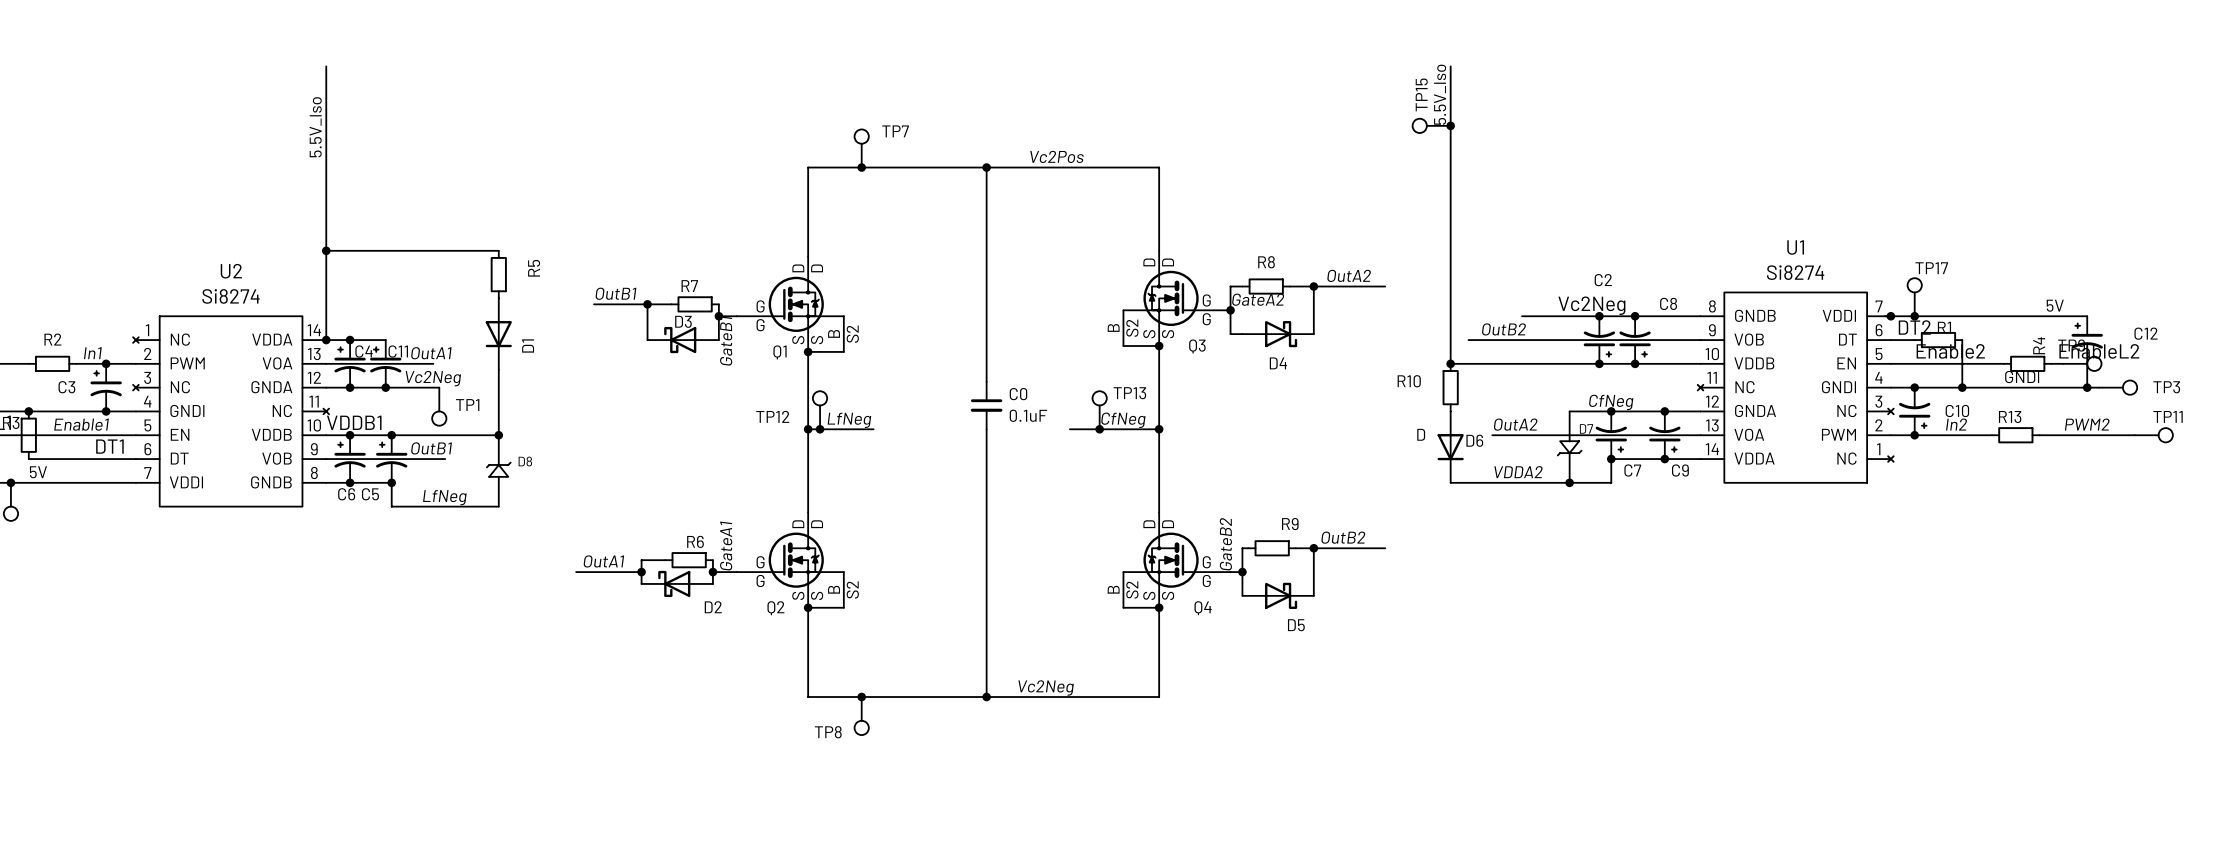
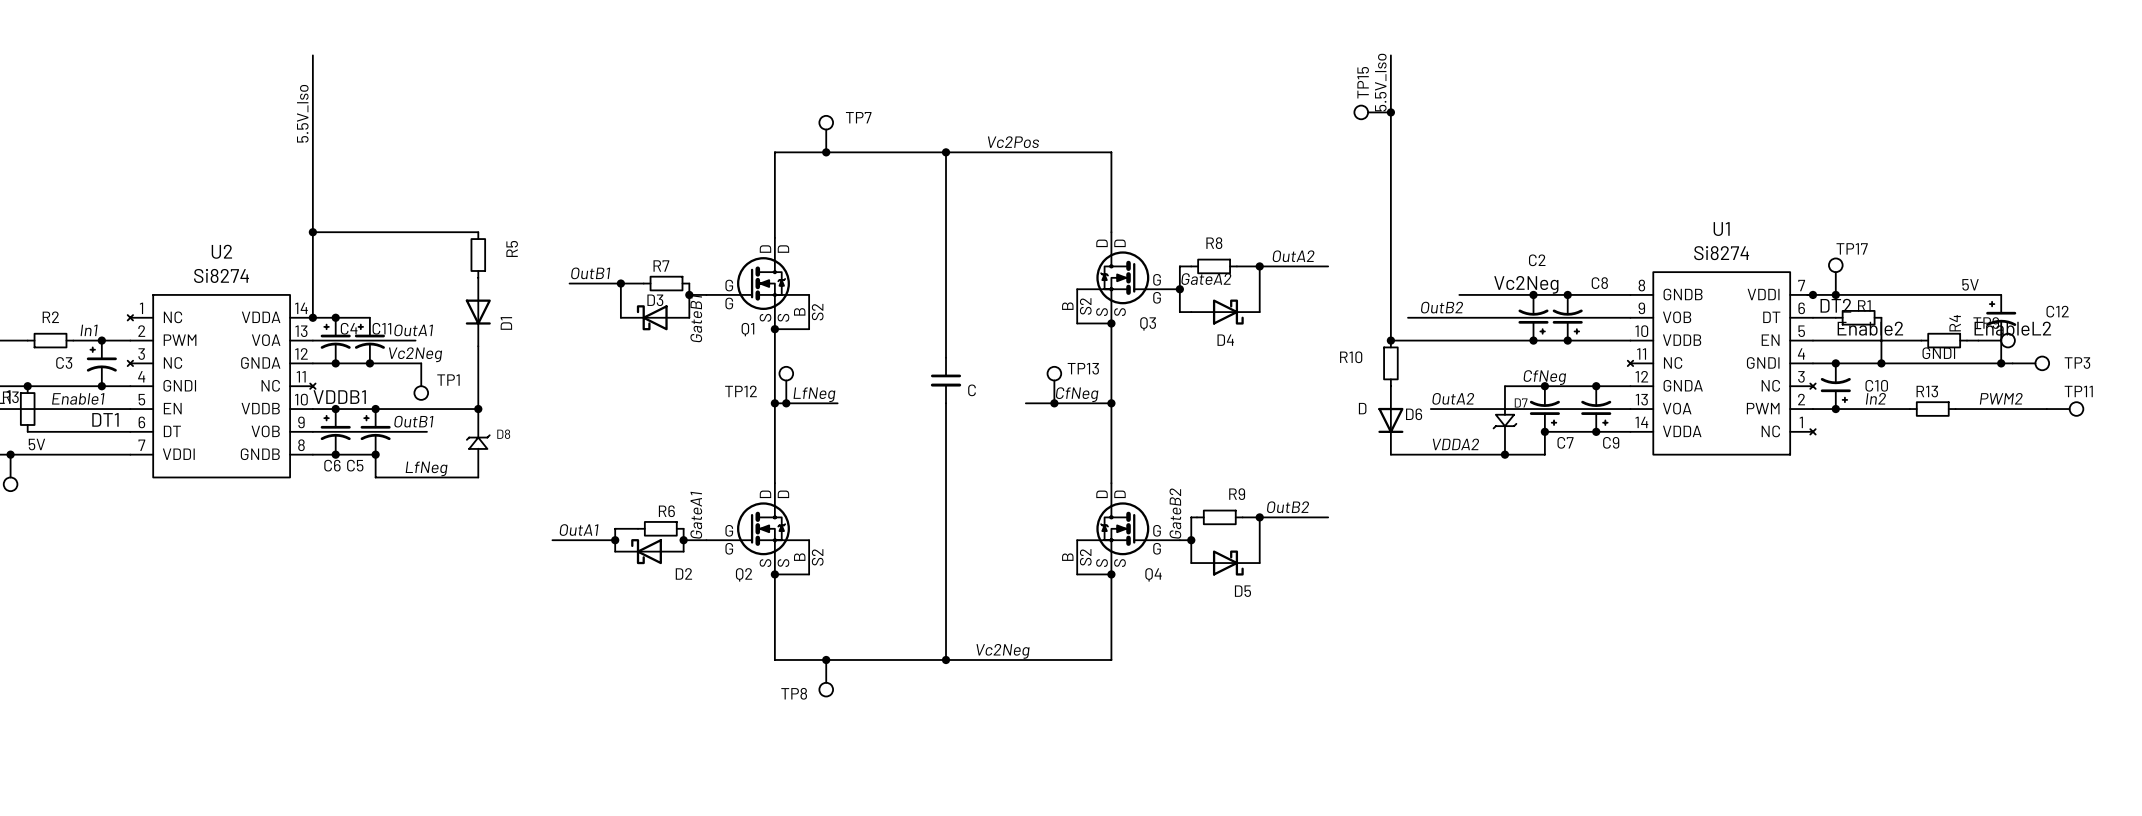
C0 name: C0 (1018, 394) -> none
C0 value: 0.1uF (1028, 415) -> C (972, 390)

